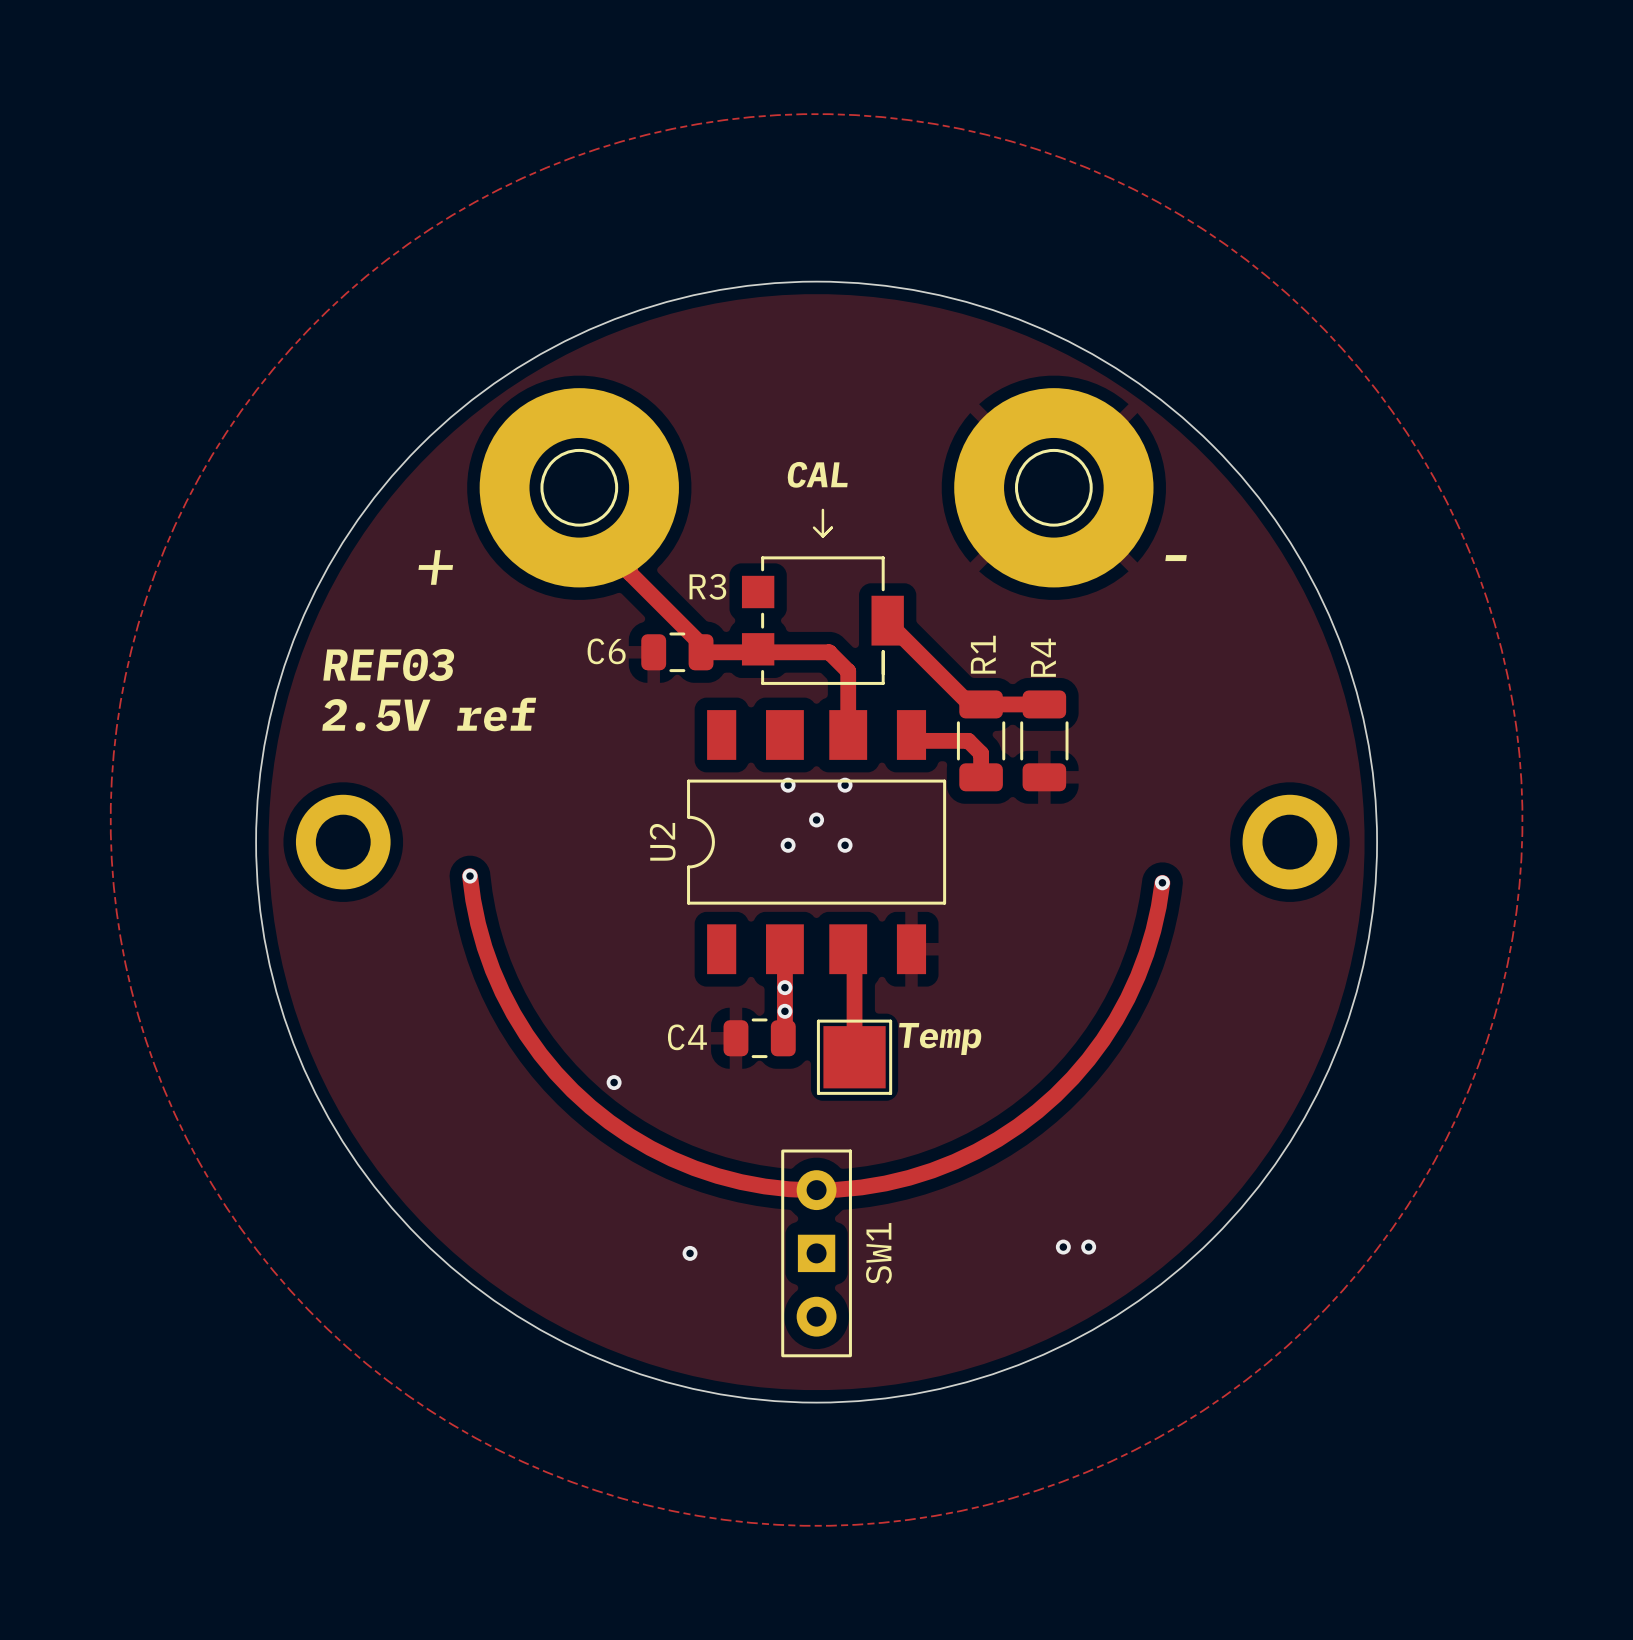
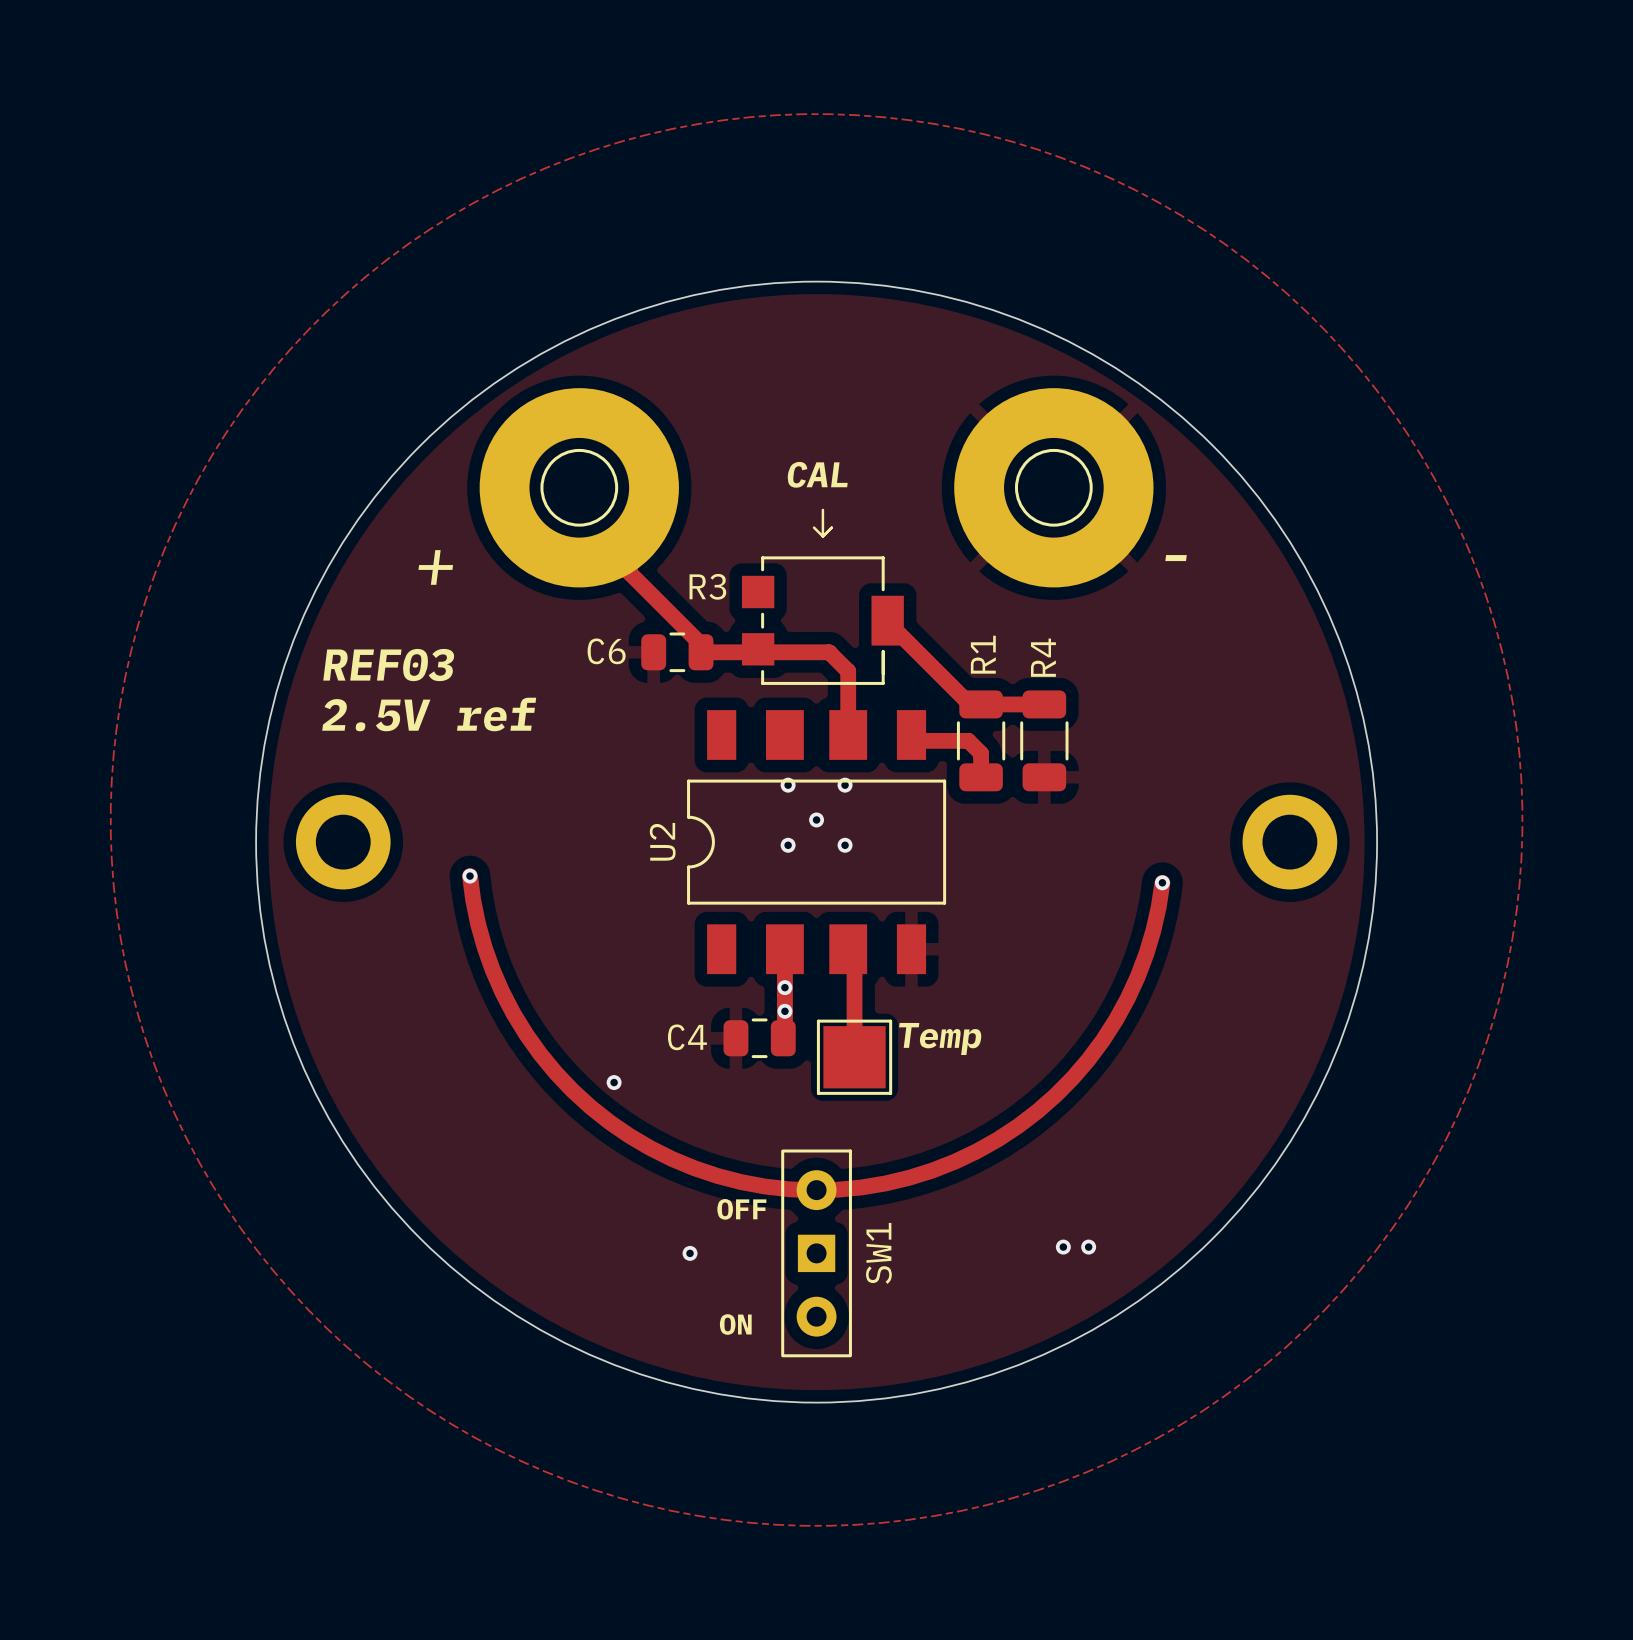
text: none -> OFF (741, 1209)
text: none -> ON (735, 1324)

